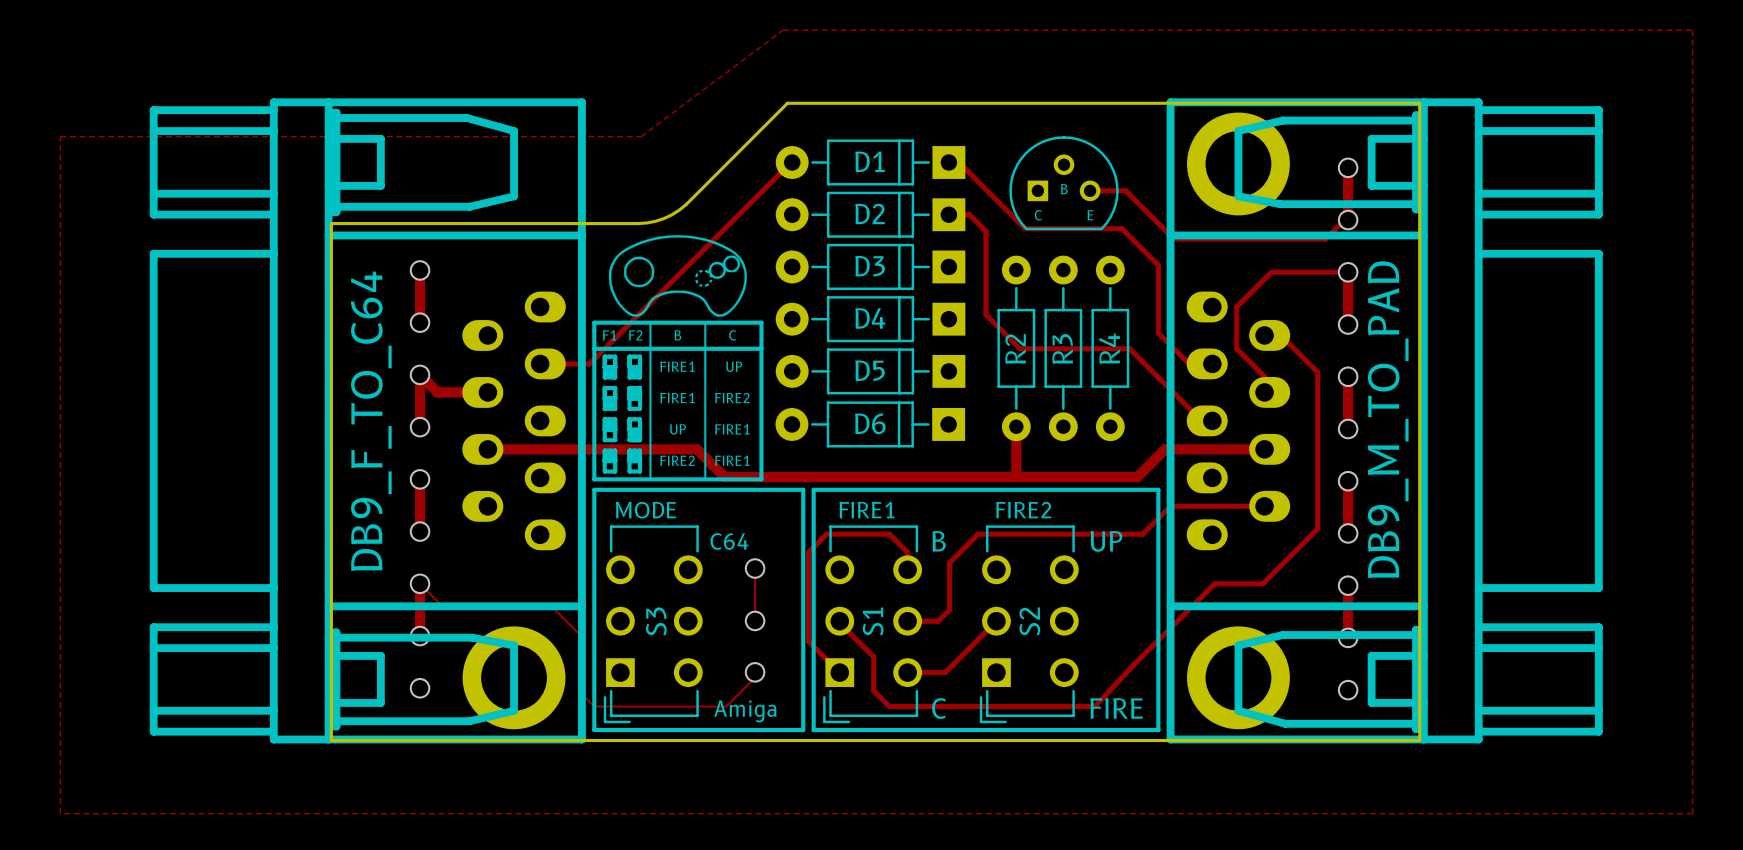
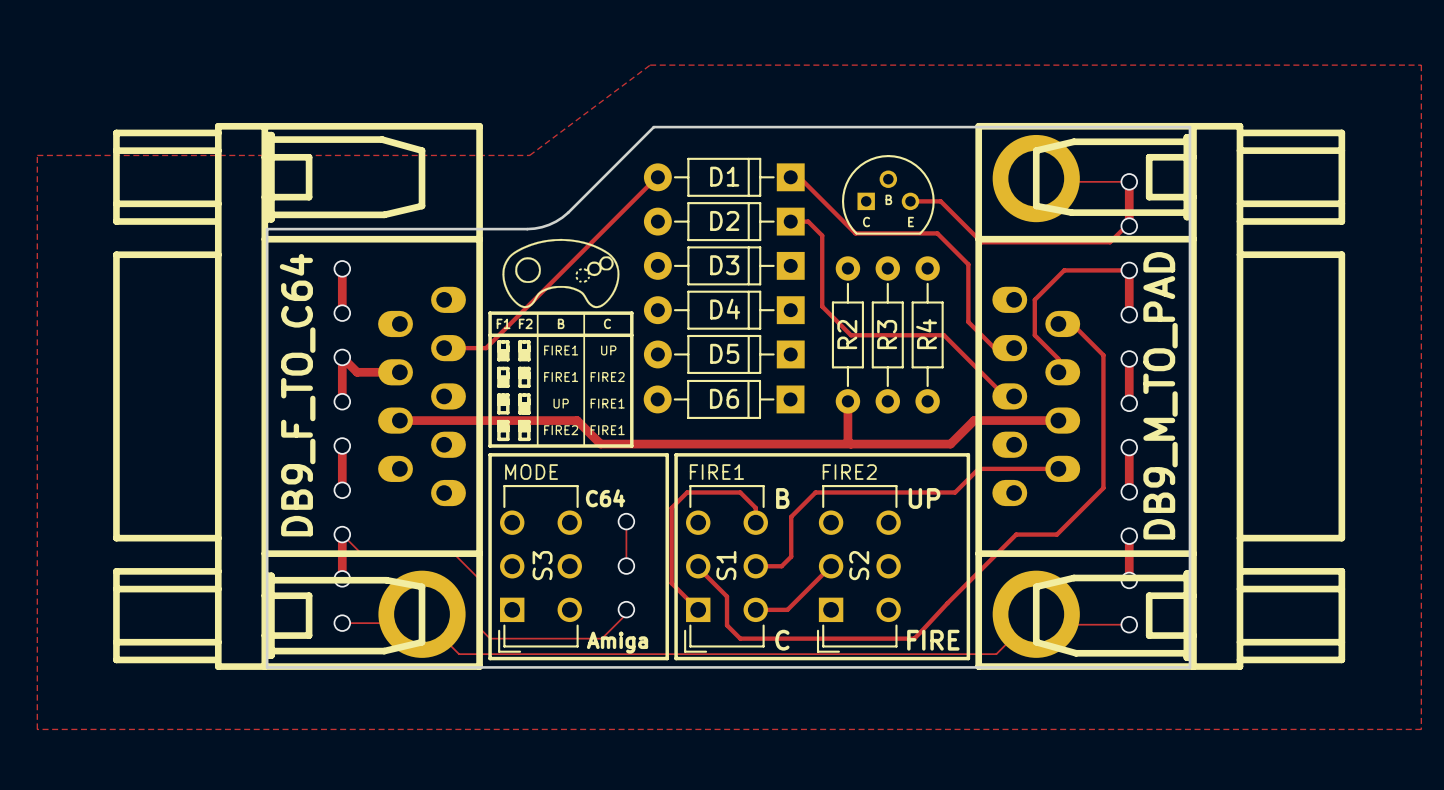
track: none -> (1036, 178) (1039, 181) (1129, 181)
track: none -> (342, 623) (413, 623) (422, 614) (422, 617) (459, 654) (996, 654) (1036, 614) (1046, 624) (1129, 624)

